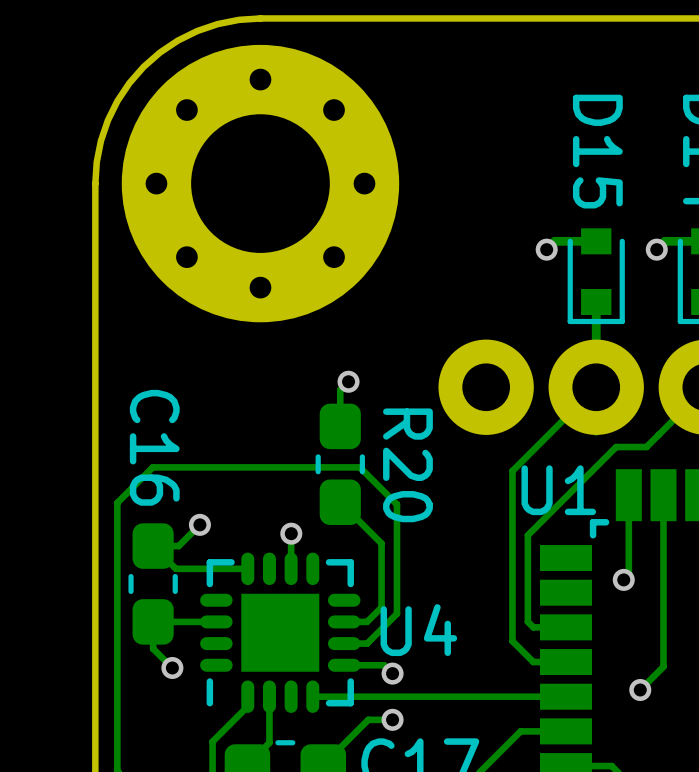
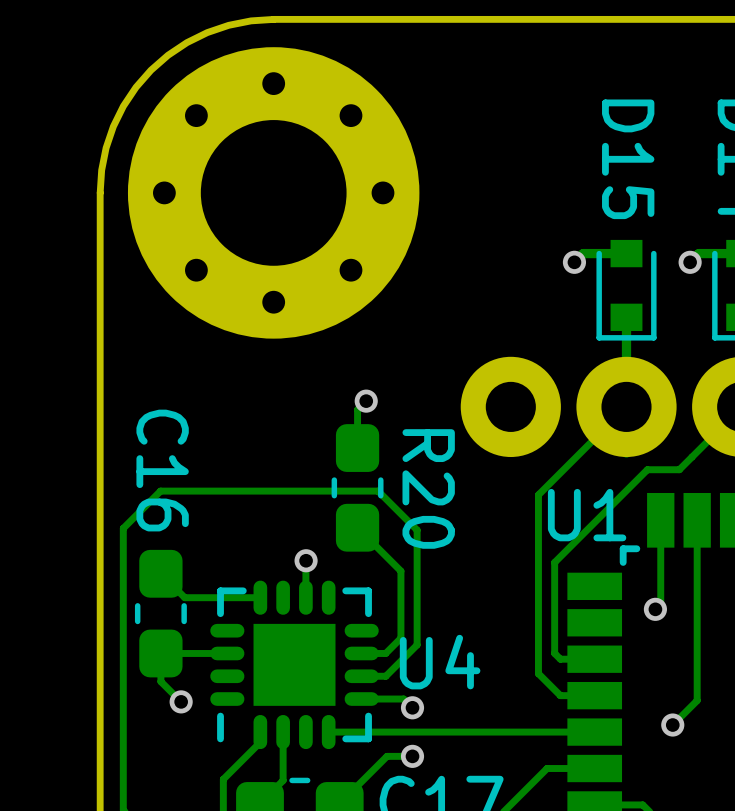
track: (199, 524) (178, 546) (153, 546) -> none
via: (199, 524) -> none

